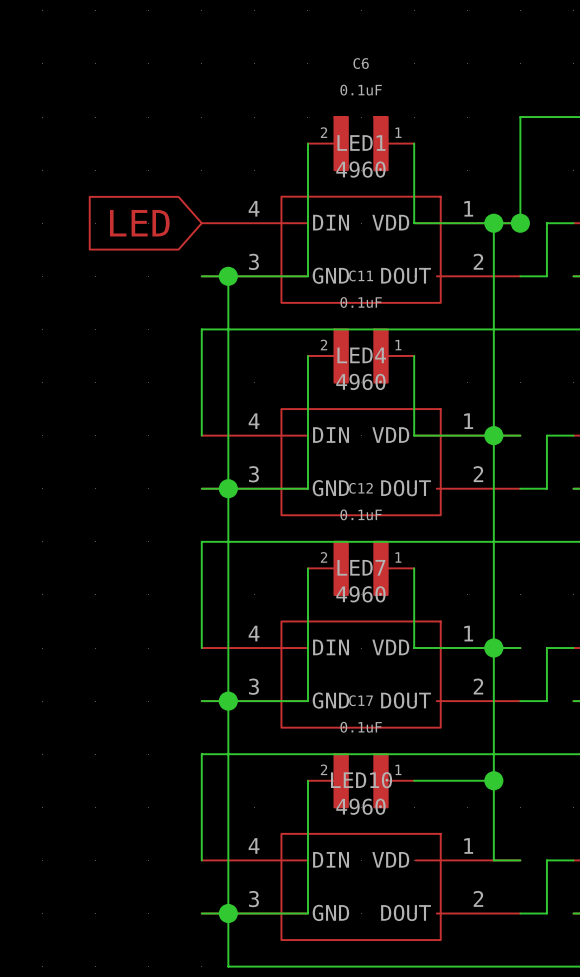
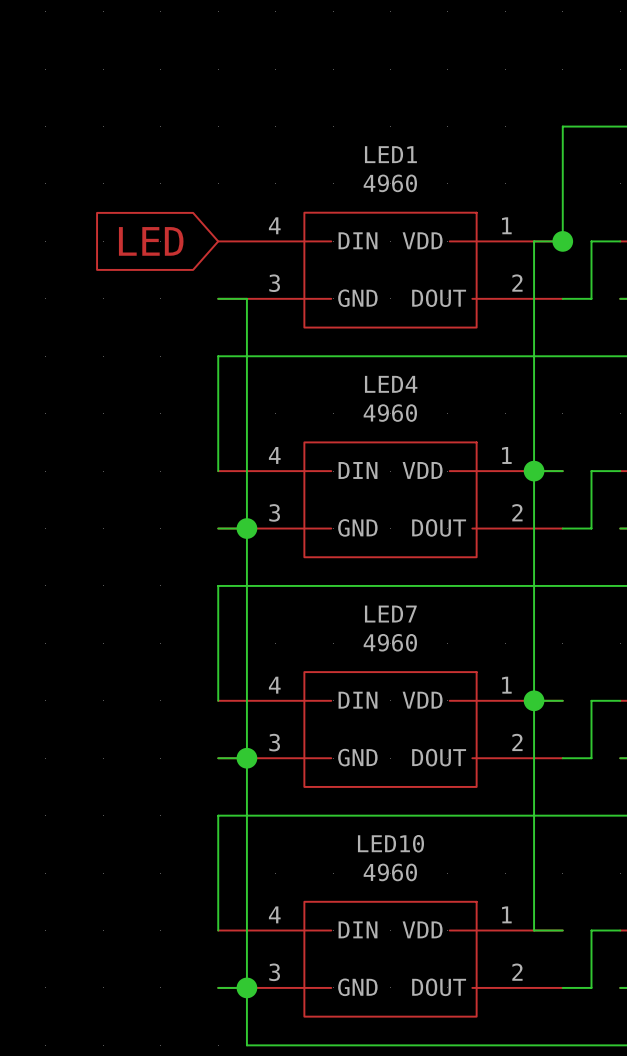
wire: (307, 143) (307, 276) (228, 276) -> none
C6: 0.1uF (361, 143) -> none
wire: (414, 143) (414, 223) (493, 223) -> none
junction: (493, 223) -> none
junction: (228, 276) -> none
wire: (307, 355) (307, 488) (228, 488) -> none
C11: 0.1uF (361, 355) -> none
wire: (414, 355) (414, 435) (493, 435) -> none
wire: (307, 568) (307, 701) (228, 701) -> none
C12: 0.1uF (361, 568) -> none
wire: (414, 568) (414, 648) (493, 648) -> none
wire: (307, 780) (307, 913) (228, 913) -> none
C17: 0.1uF (361, 780) -> none
wire: (414, 780) (493, 780) -> none
junction: (493, 780) -> none

